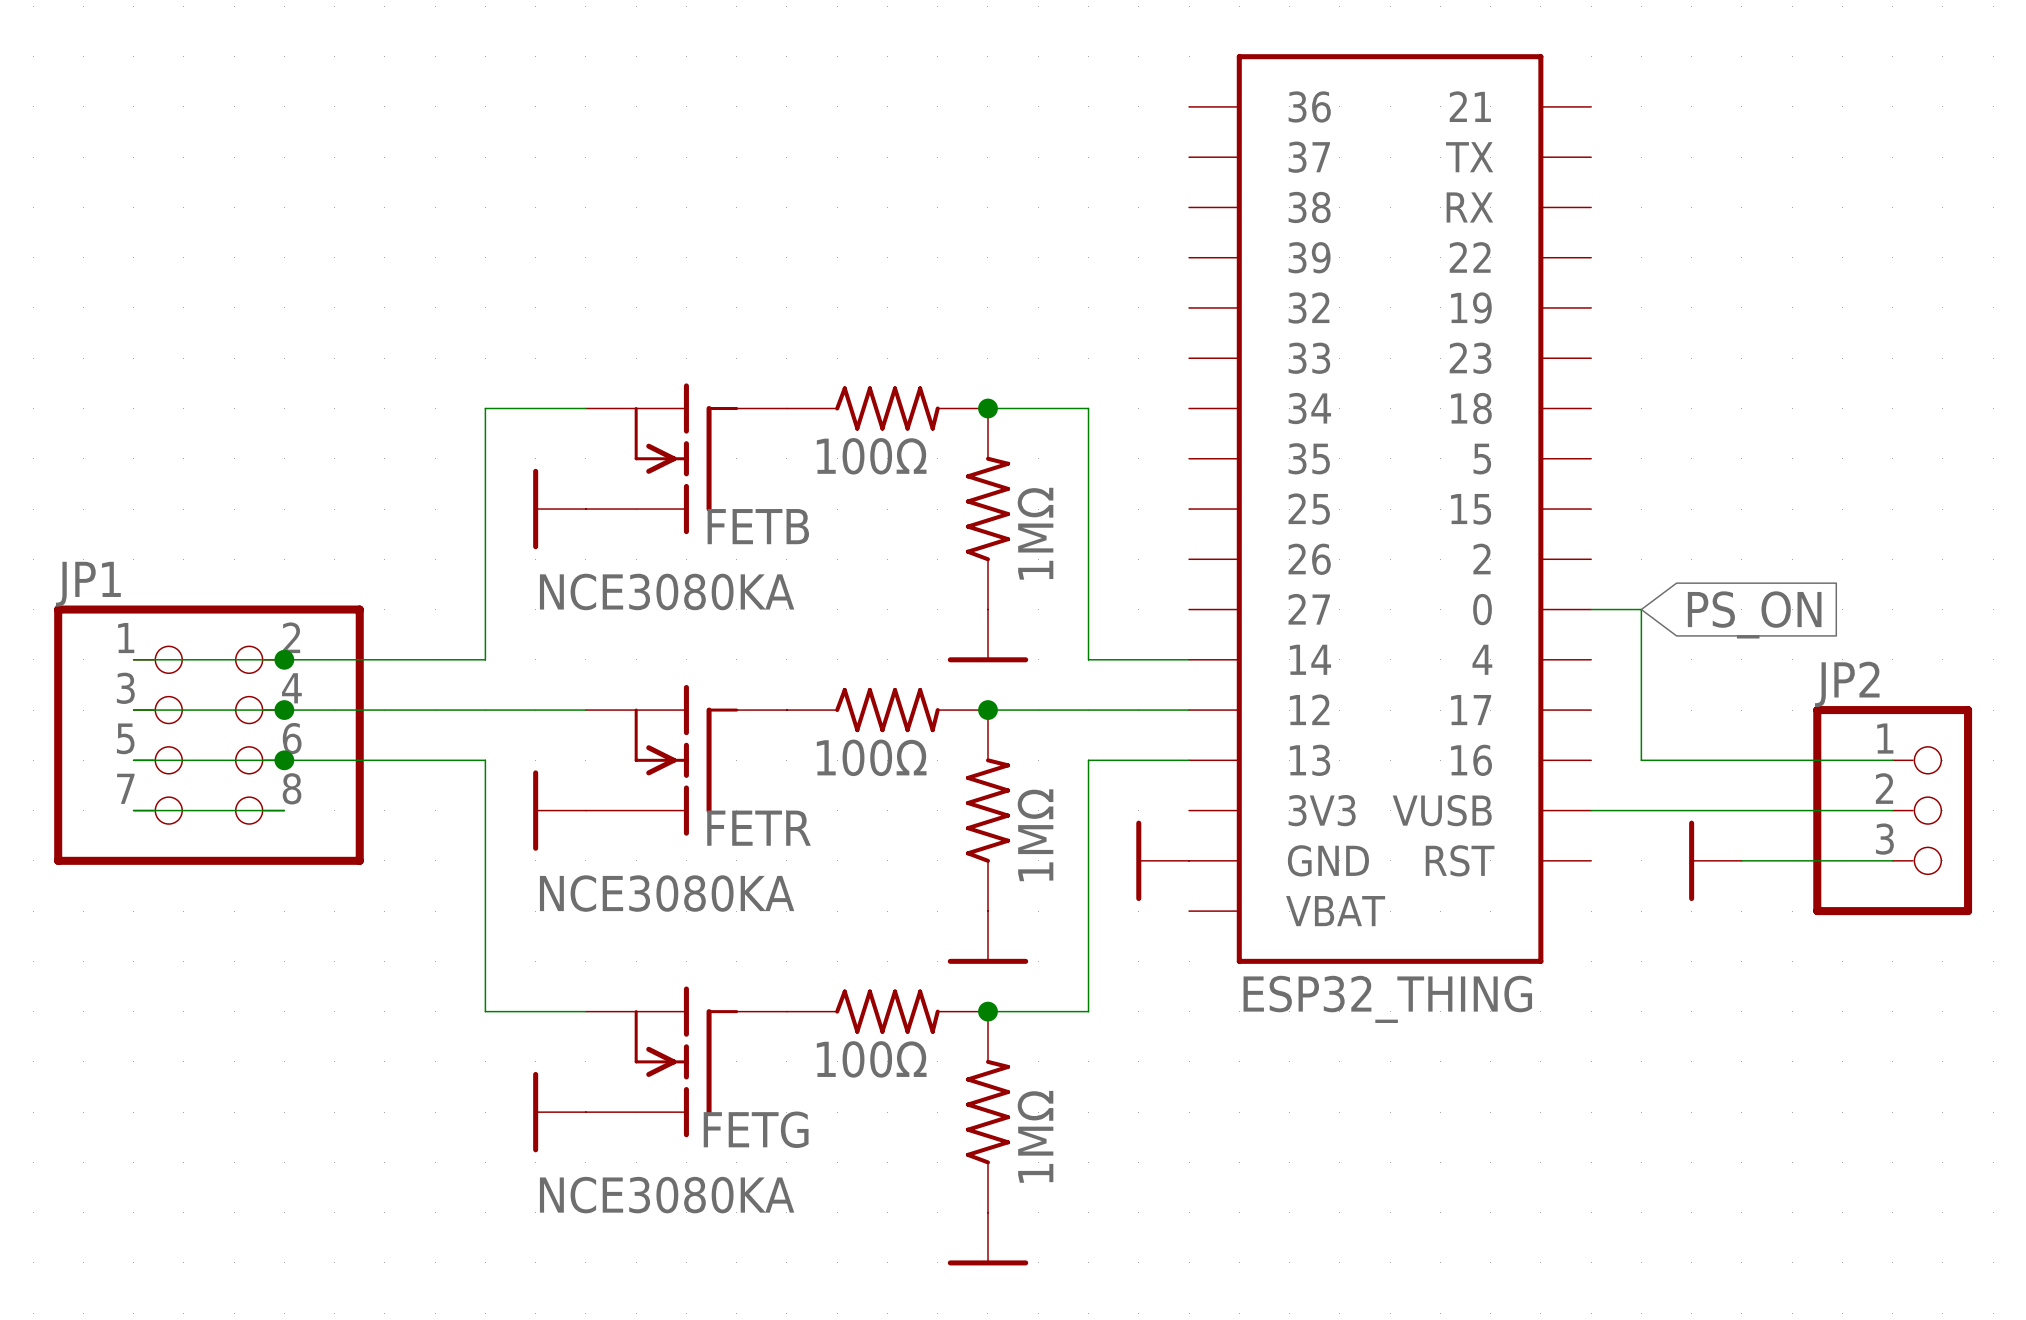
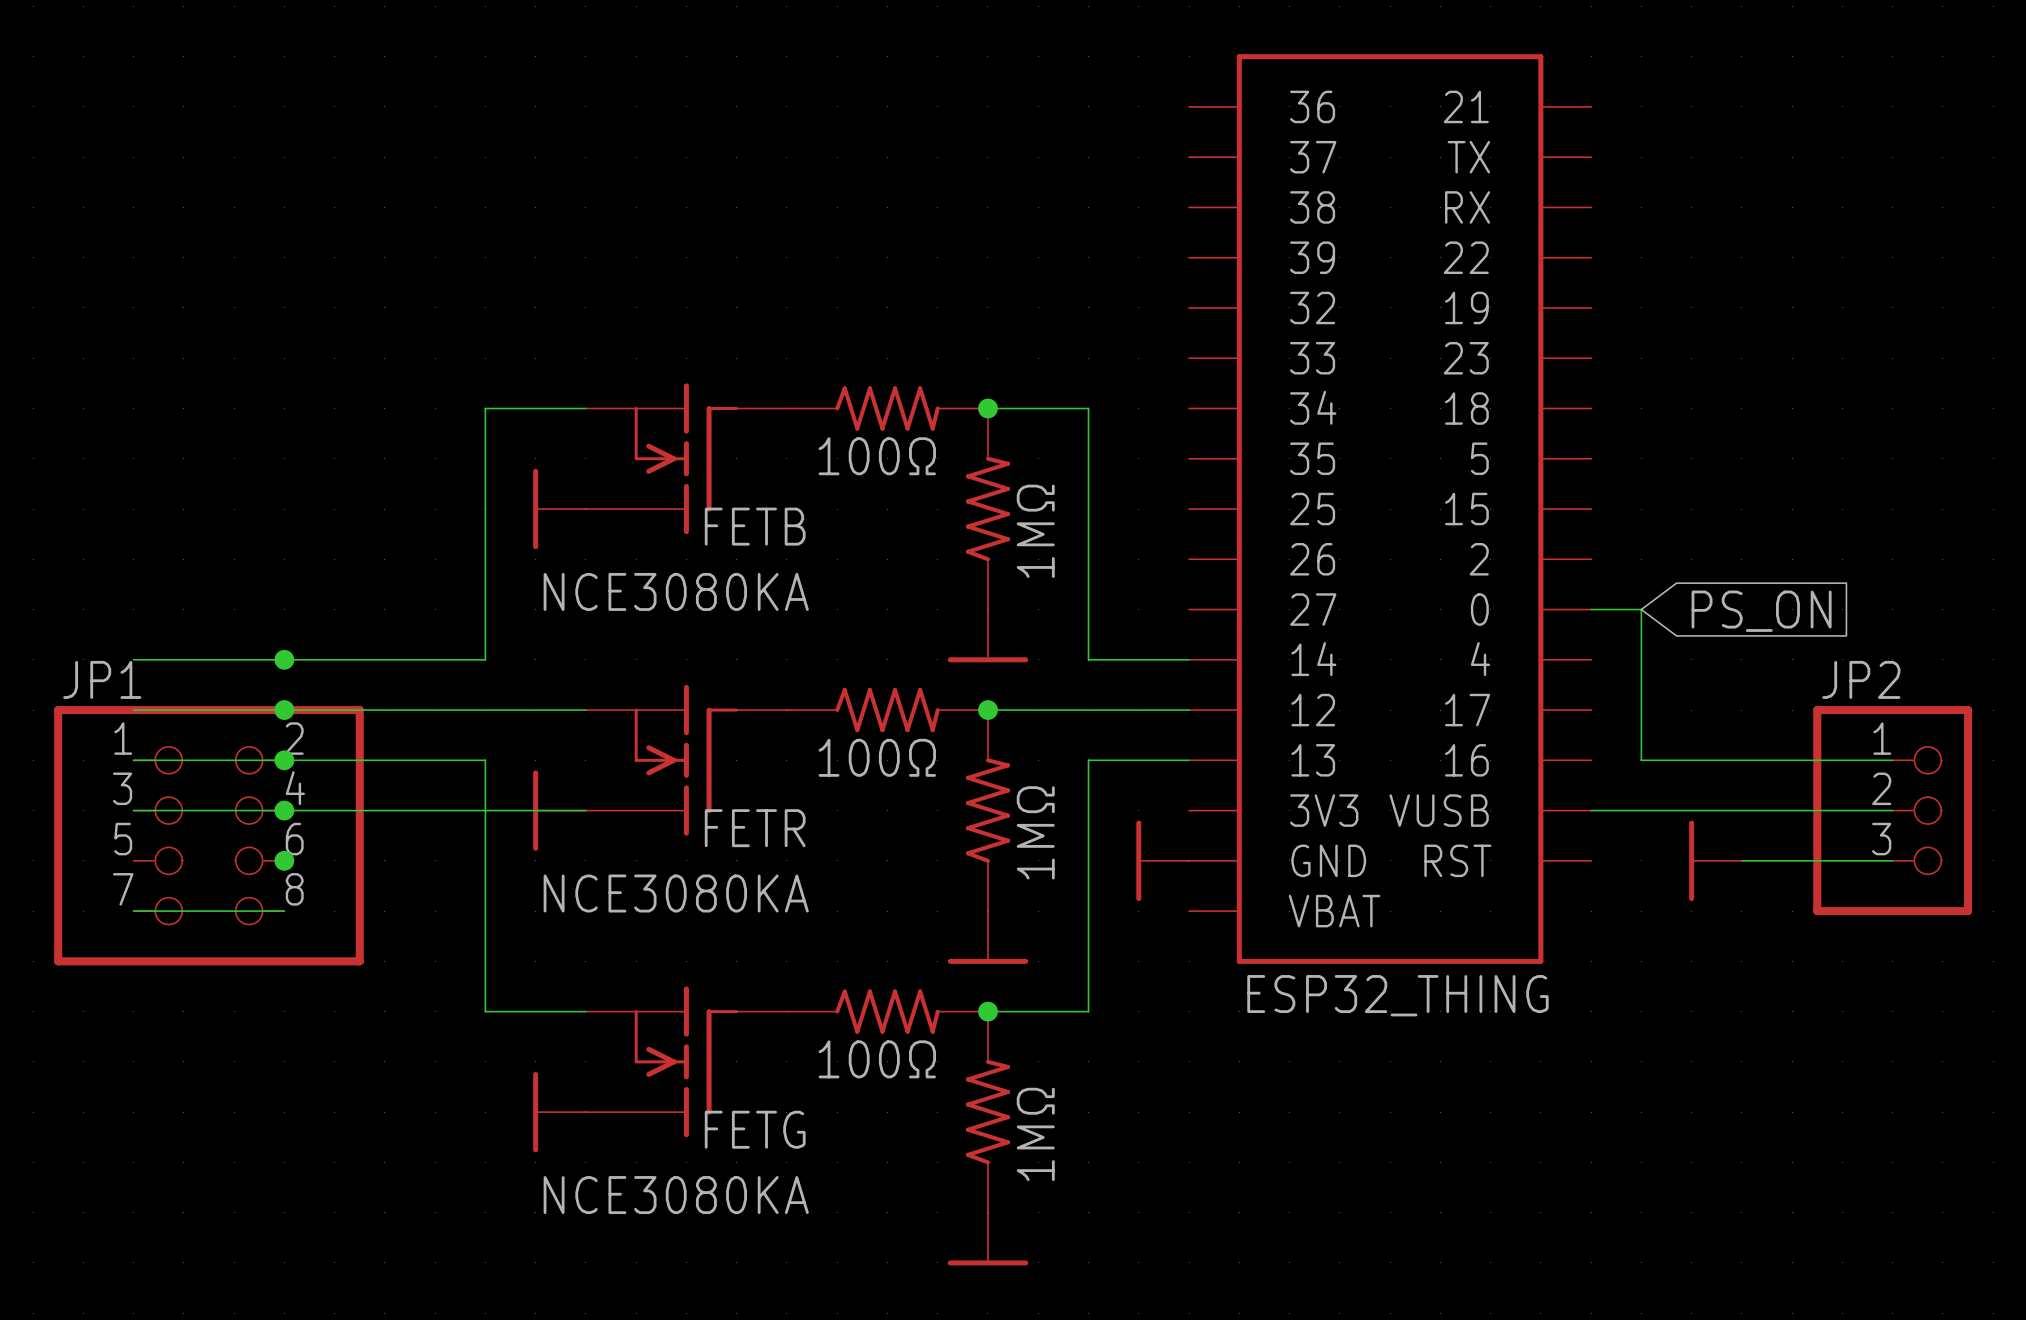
JP1 position: (208, 735) -> (208, 835)
wire: none -> (284, 810) (585, 810)
junction: none -> (284, 810)
junction: none -> (284, 860)
wire: none -> (133, 911) (284, 911)

